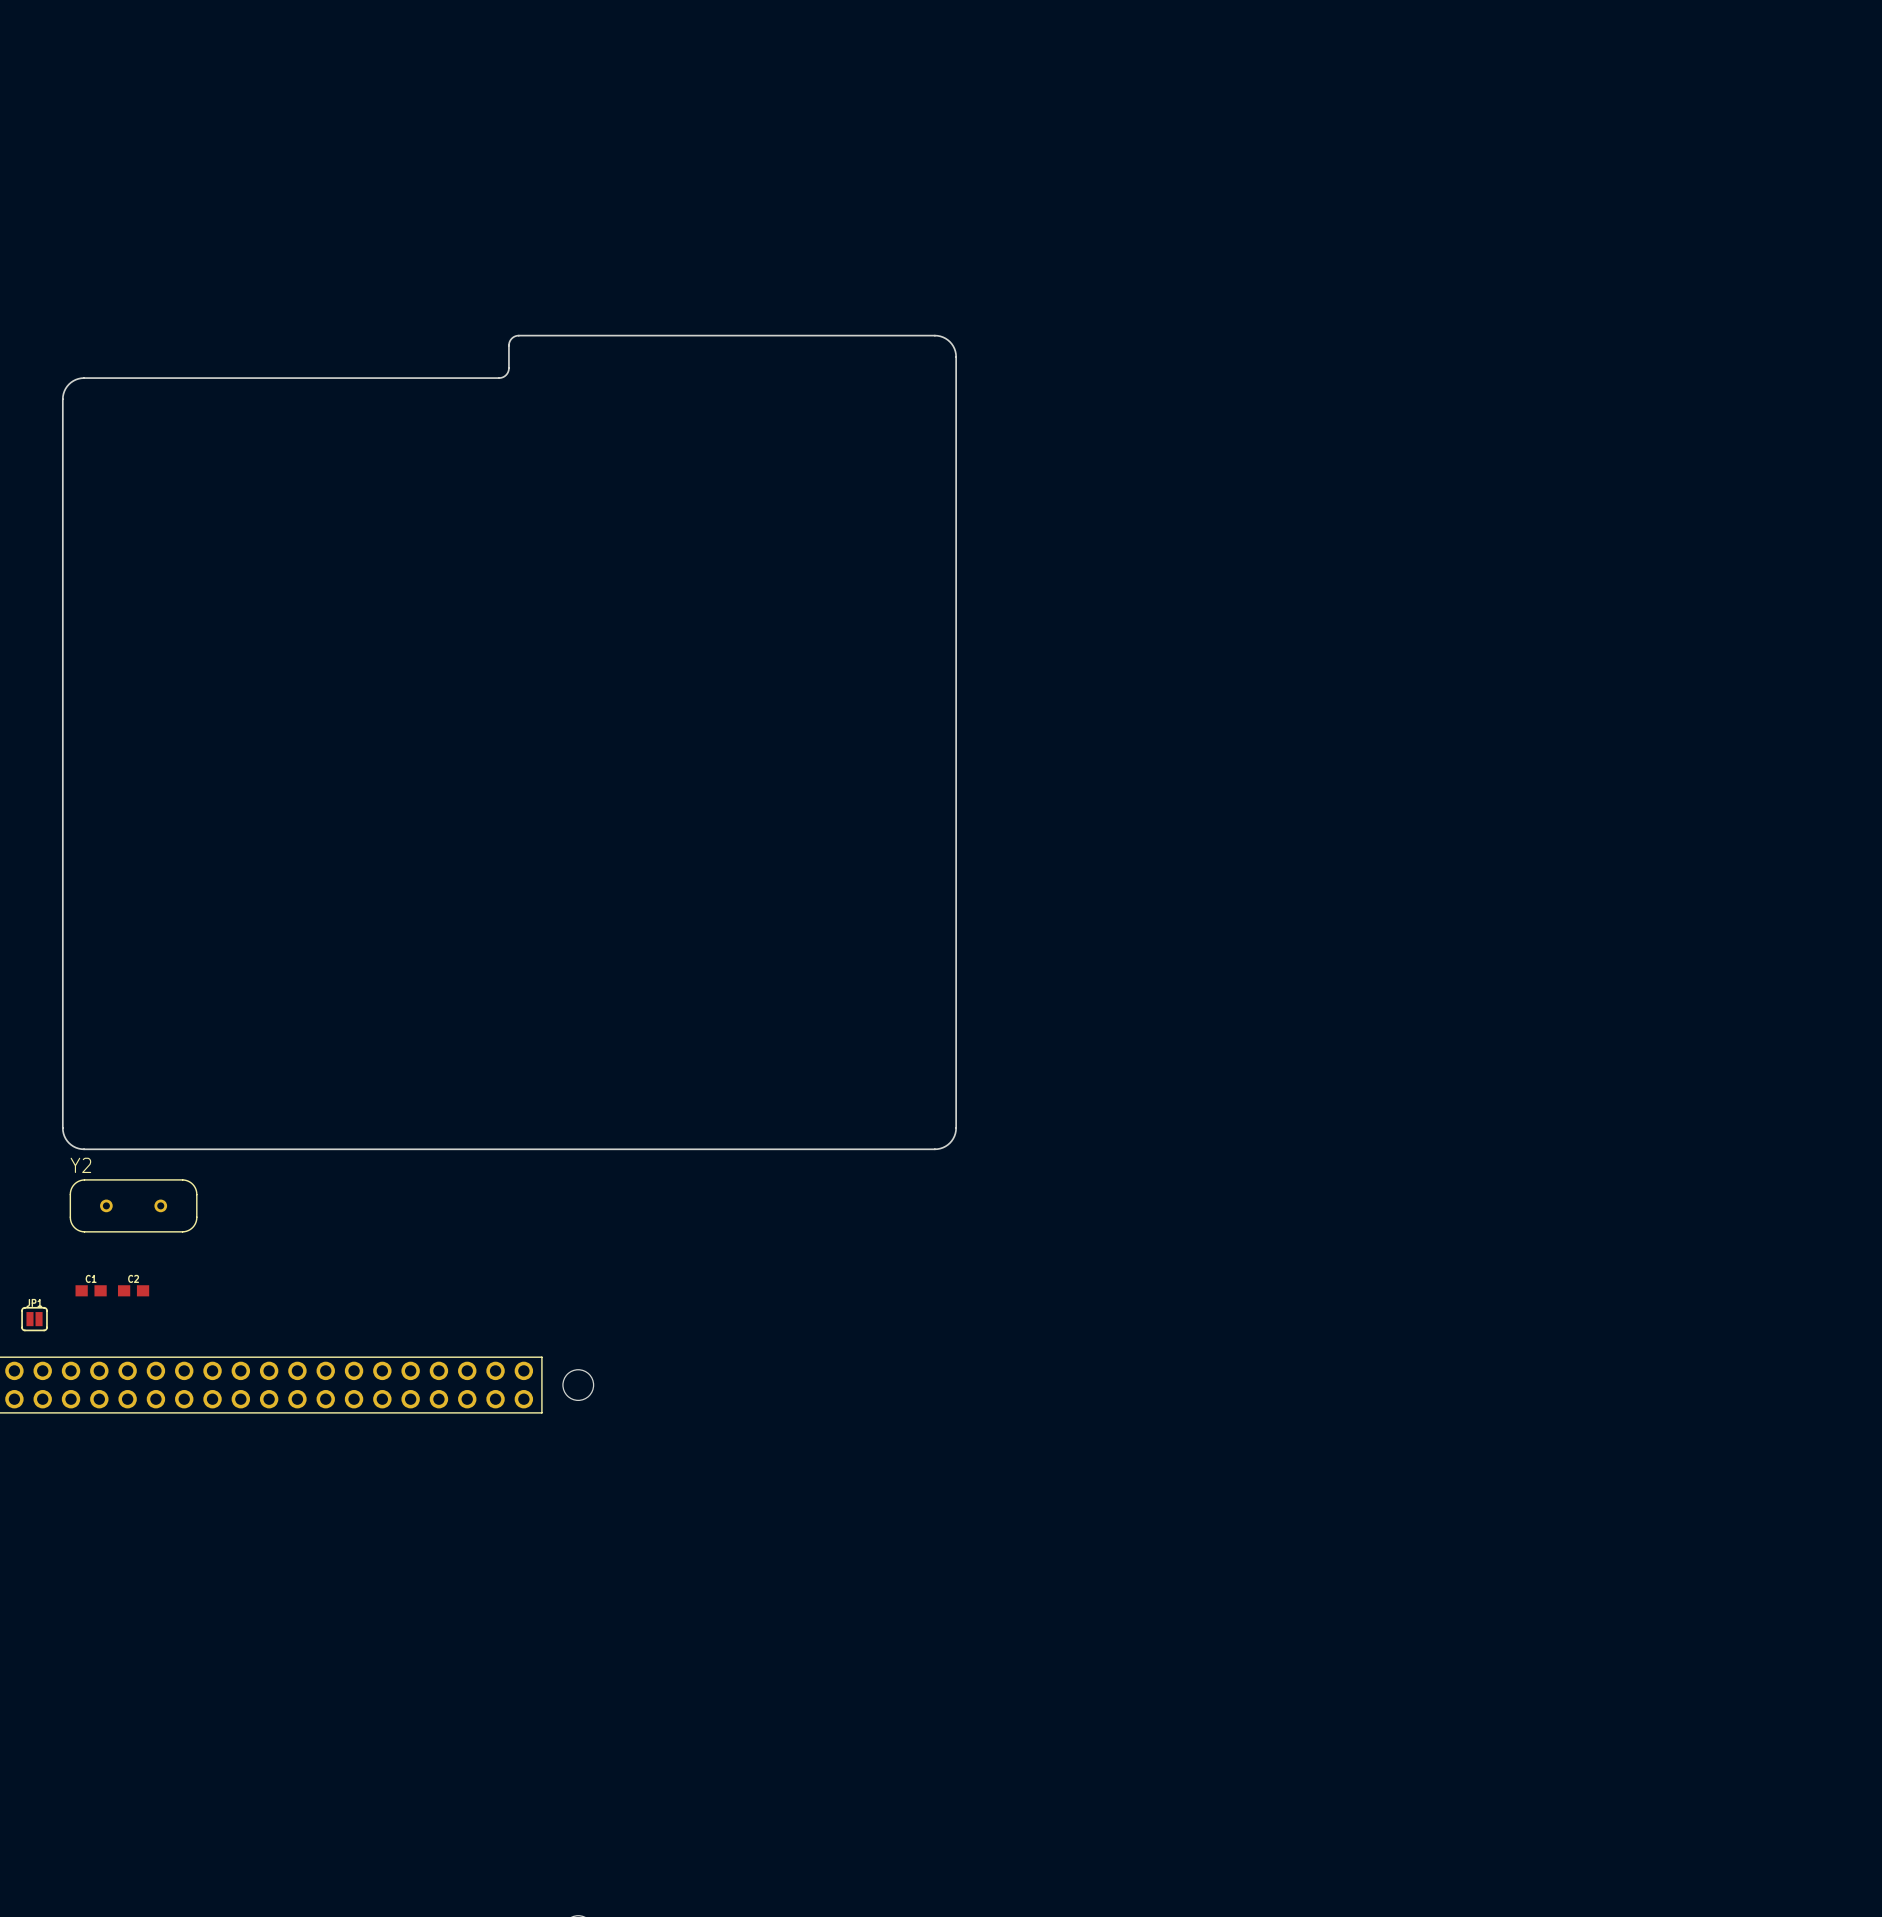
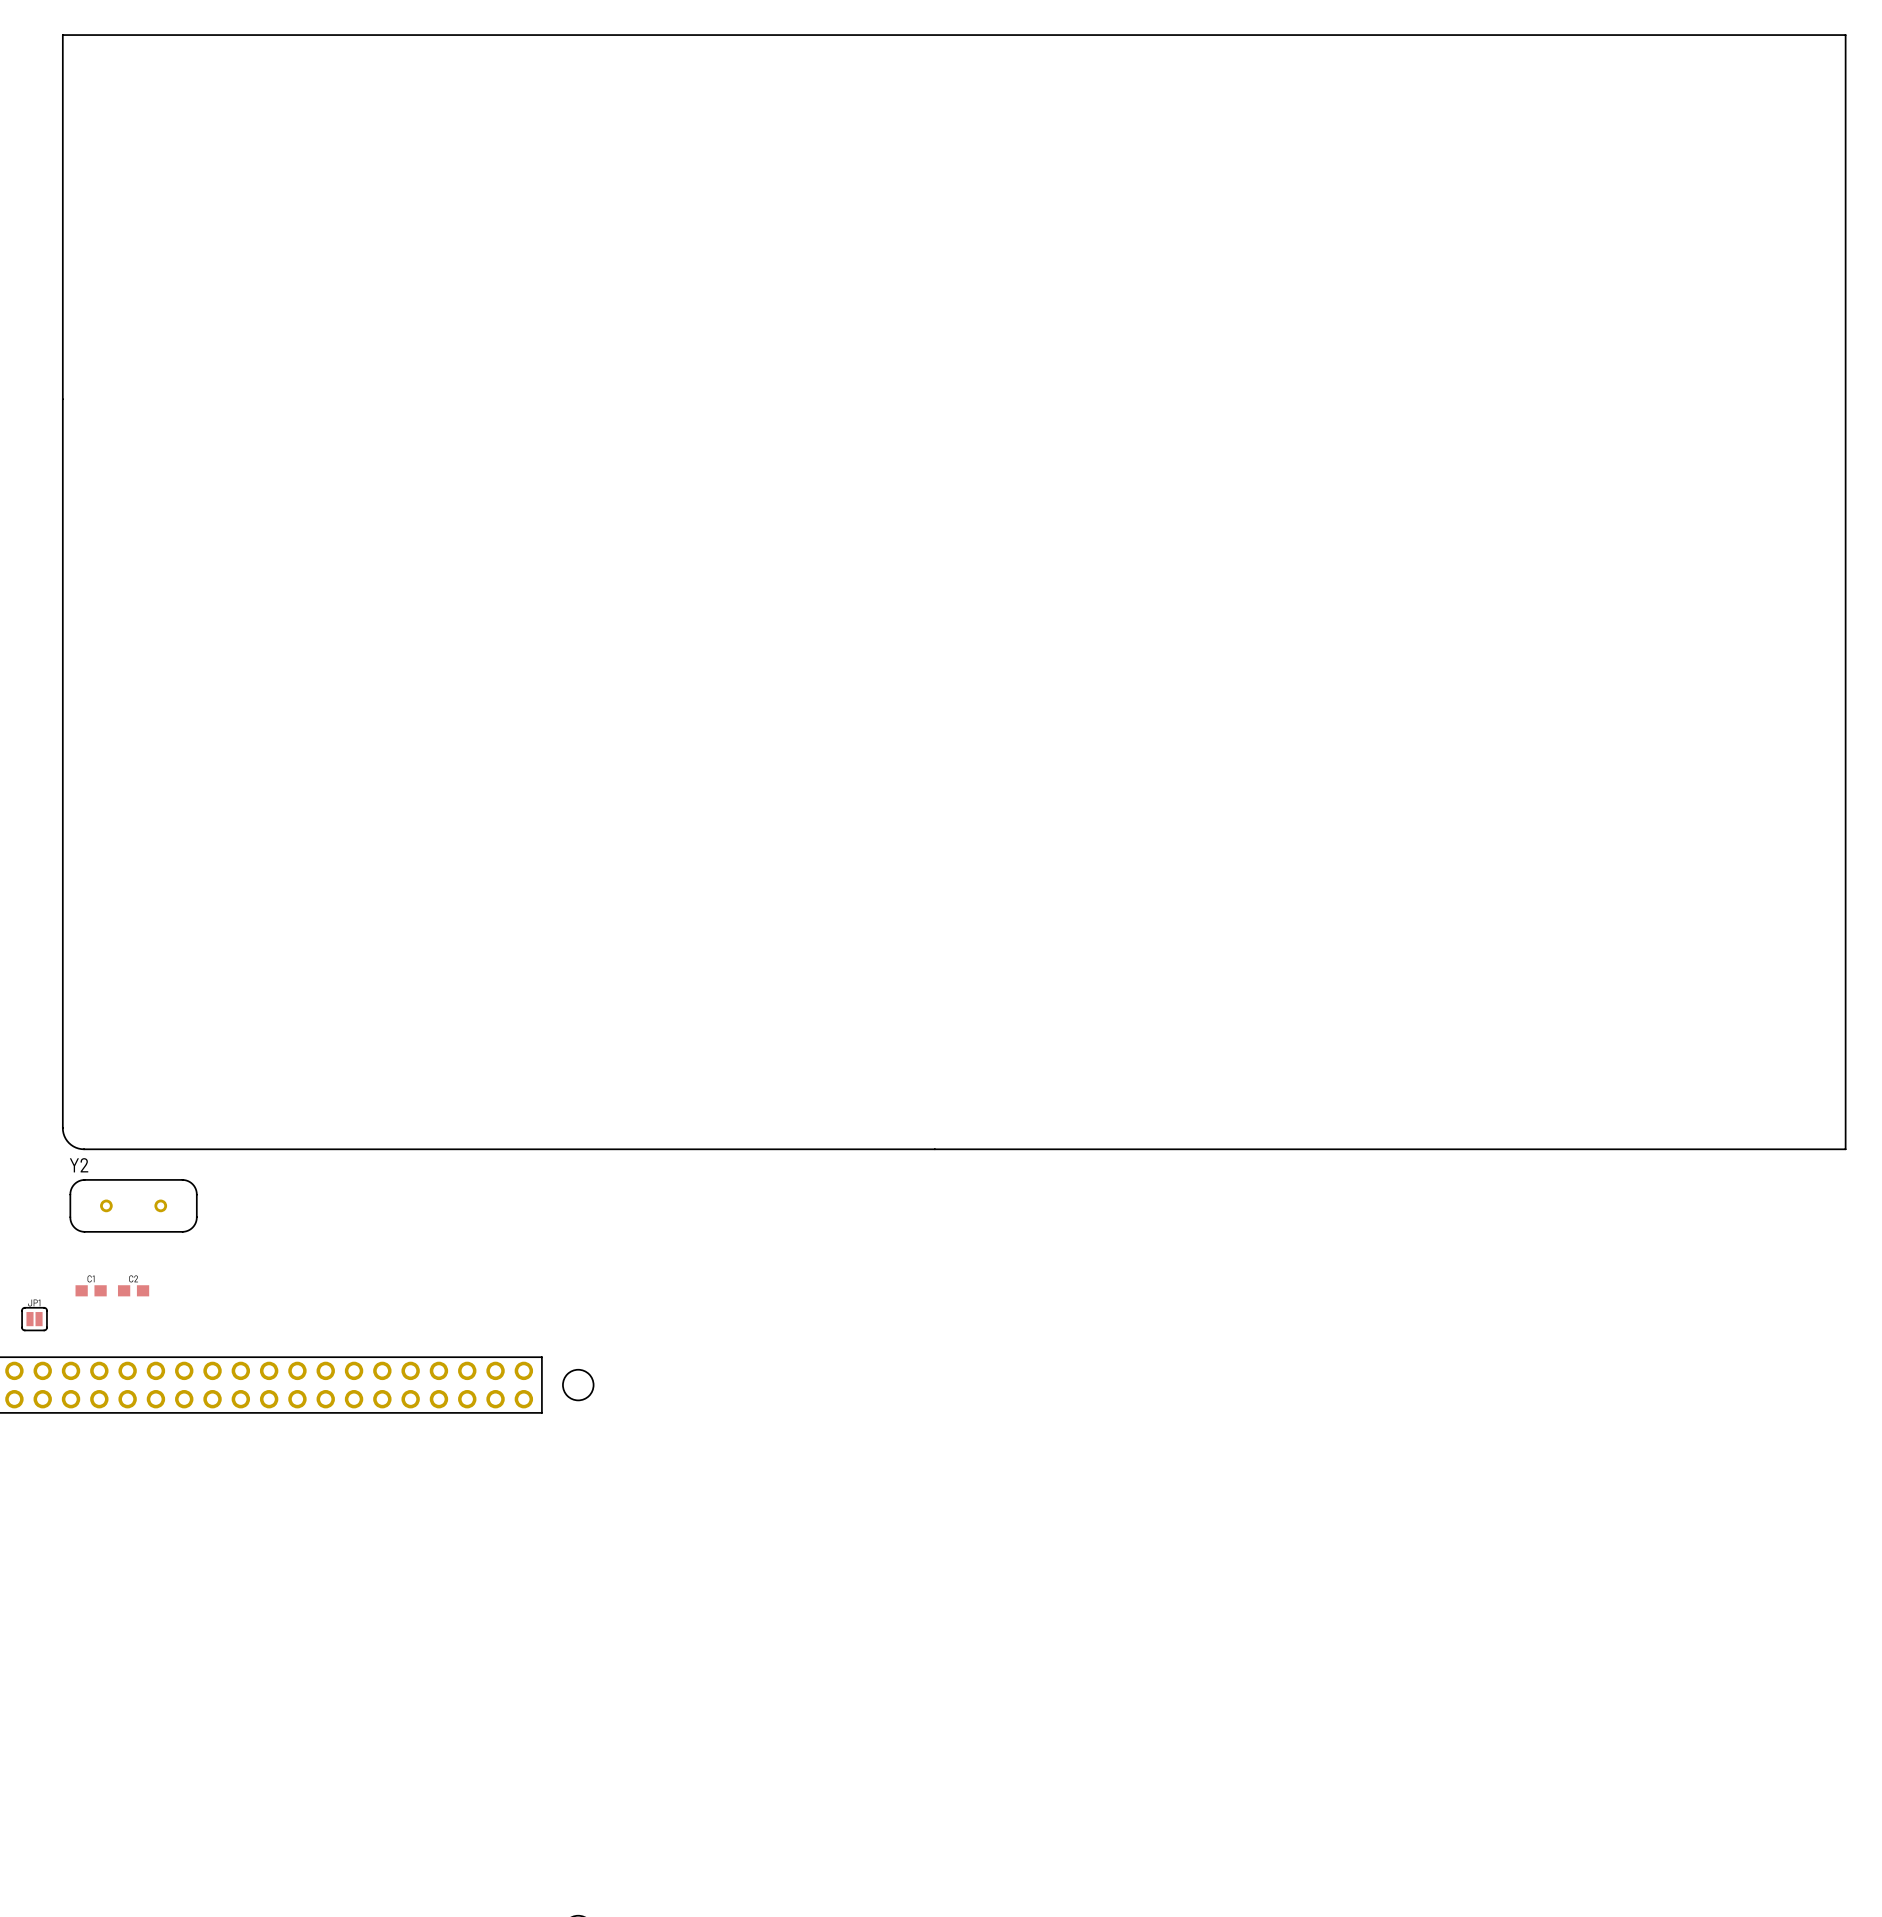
board edge: (62, 399) (64, 391) (69, 384) (75, 379) (84, 378) (500, 377) (505, 376) (508, 370) (509, 341) (517, 335) (934, 335) (947, 340) (953, 346) (956, 356) (956, 1128) (954, 1136) (949, 1143) (943, 1147) (934, 1149) -> (62, 399) (62, 35) (1845, 35) (1845, 1149) (934, 1149)

